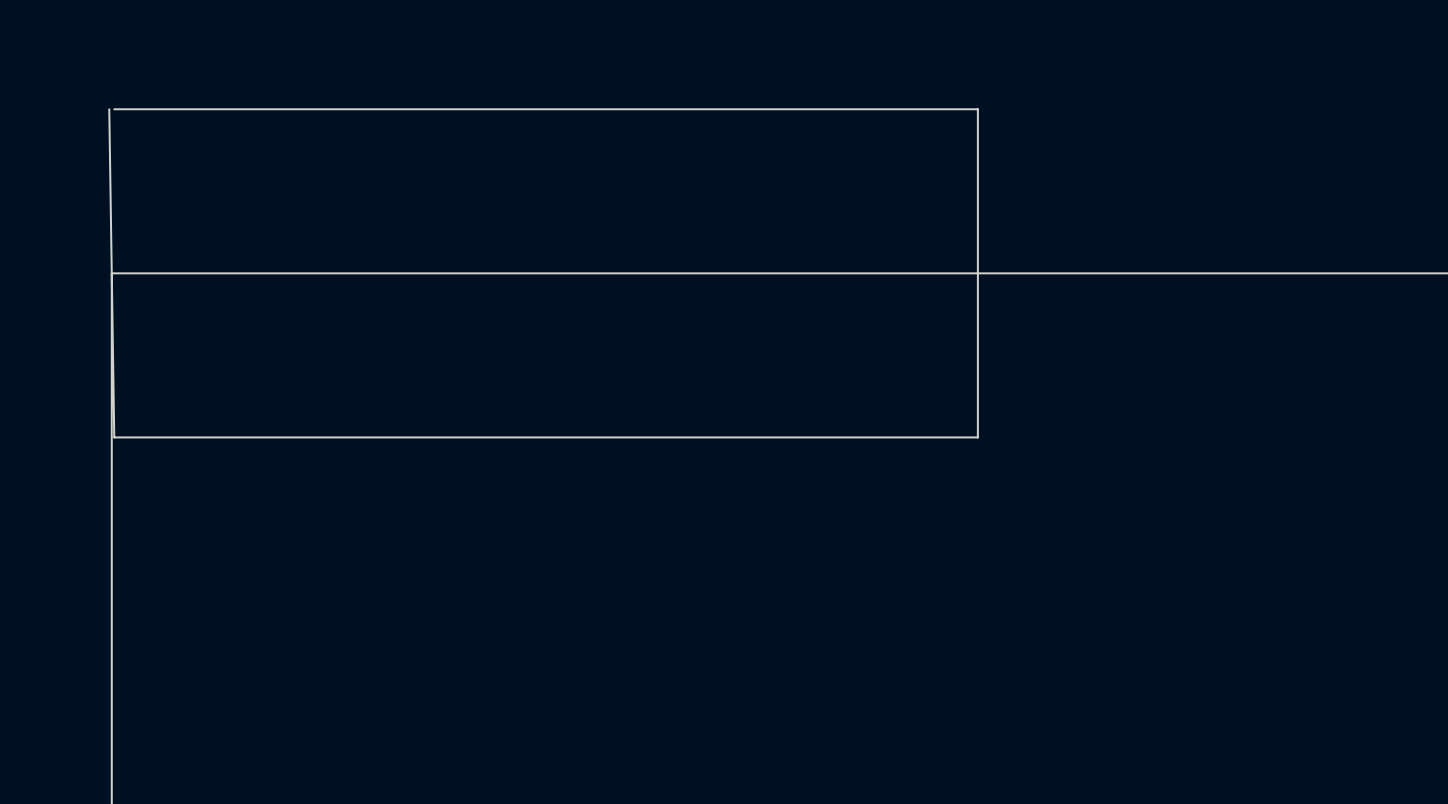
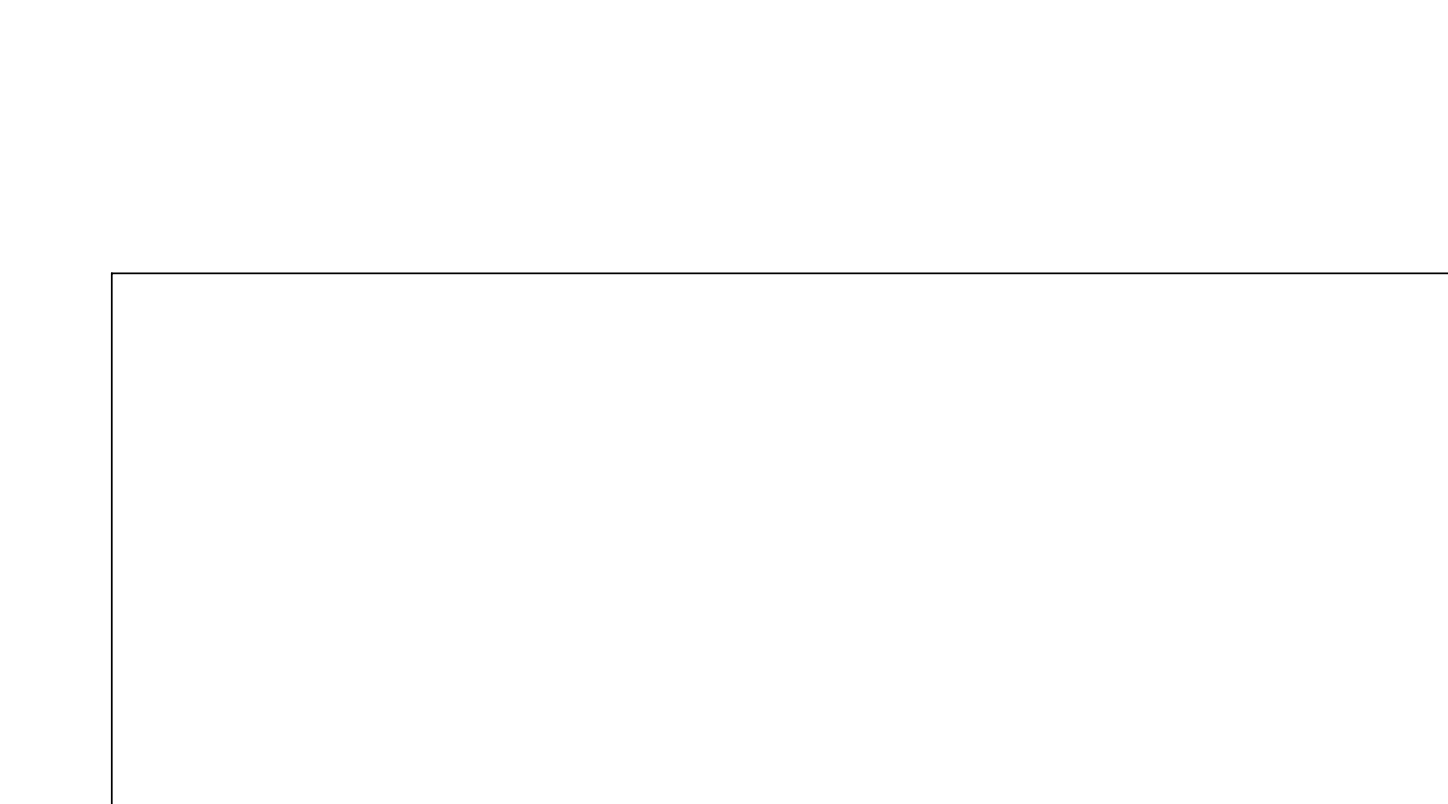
board edge: (109, 109) (114, 437) (977, 437) (977, 109) (114, 109) -> none

